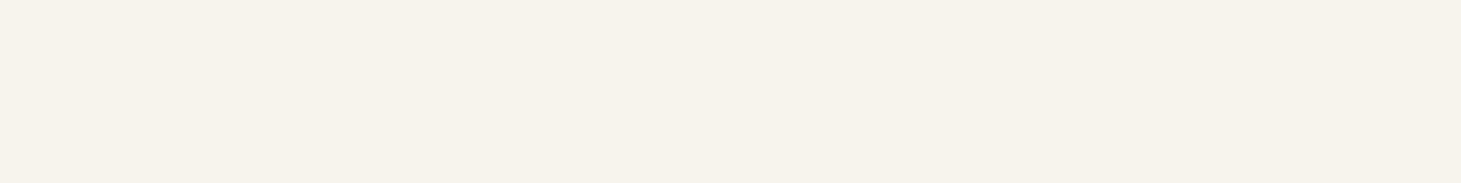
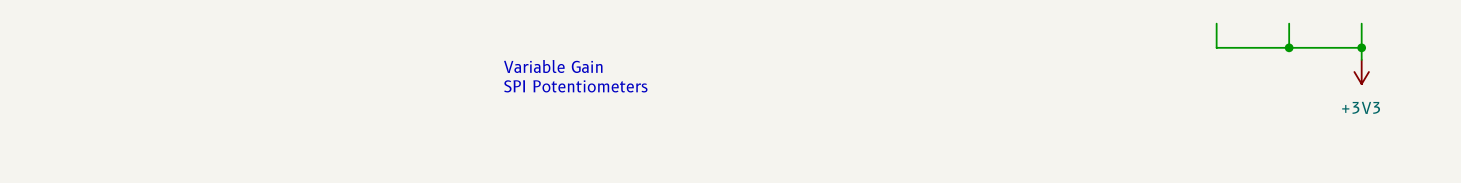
wire: none -> (1216, 23) (1216, 47) (1361, 47)
wire: none -> (1289, 23) (1289, 47)
wire: none -> (1361, 23) (1361, 59)
junction: none -> (1289, 47)
junction: none -> (1361, 47)
text: none -> Variable Gain (553, 66)
power symbol: none -> +3V3 (1361, 72)
text: none -> SPI Potentiometers (575, 86)

